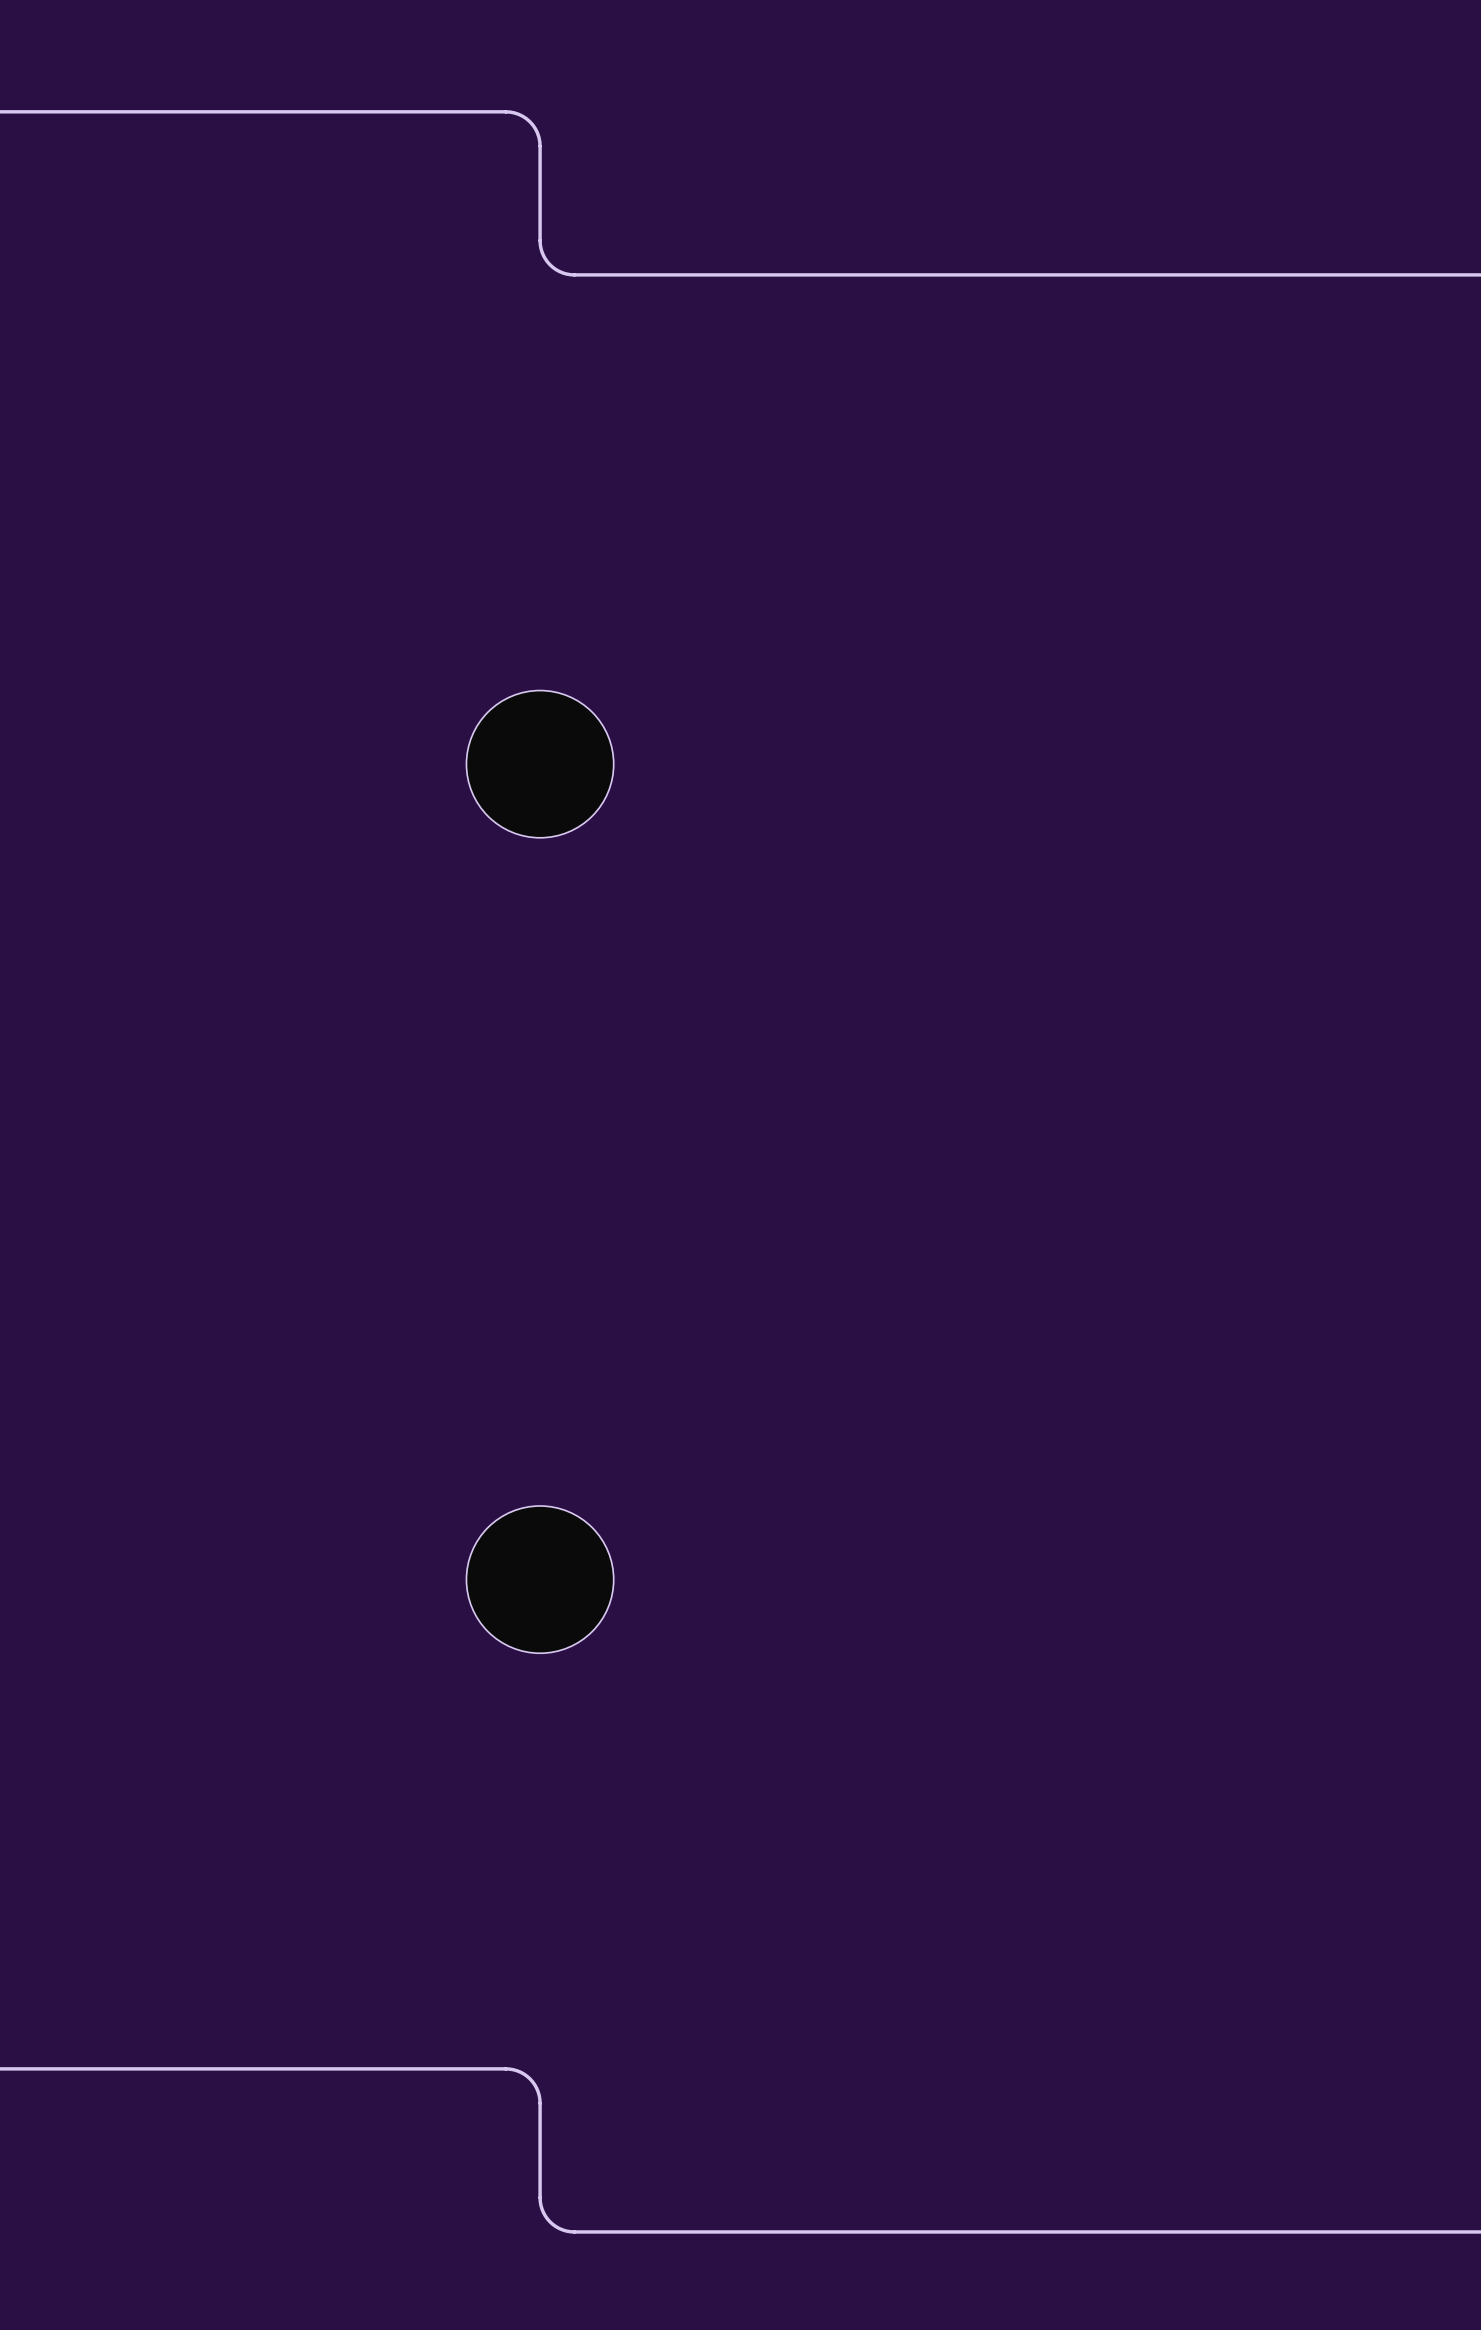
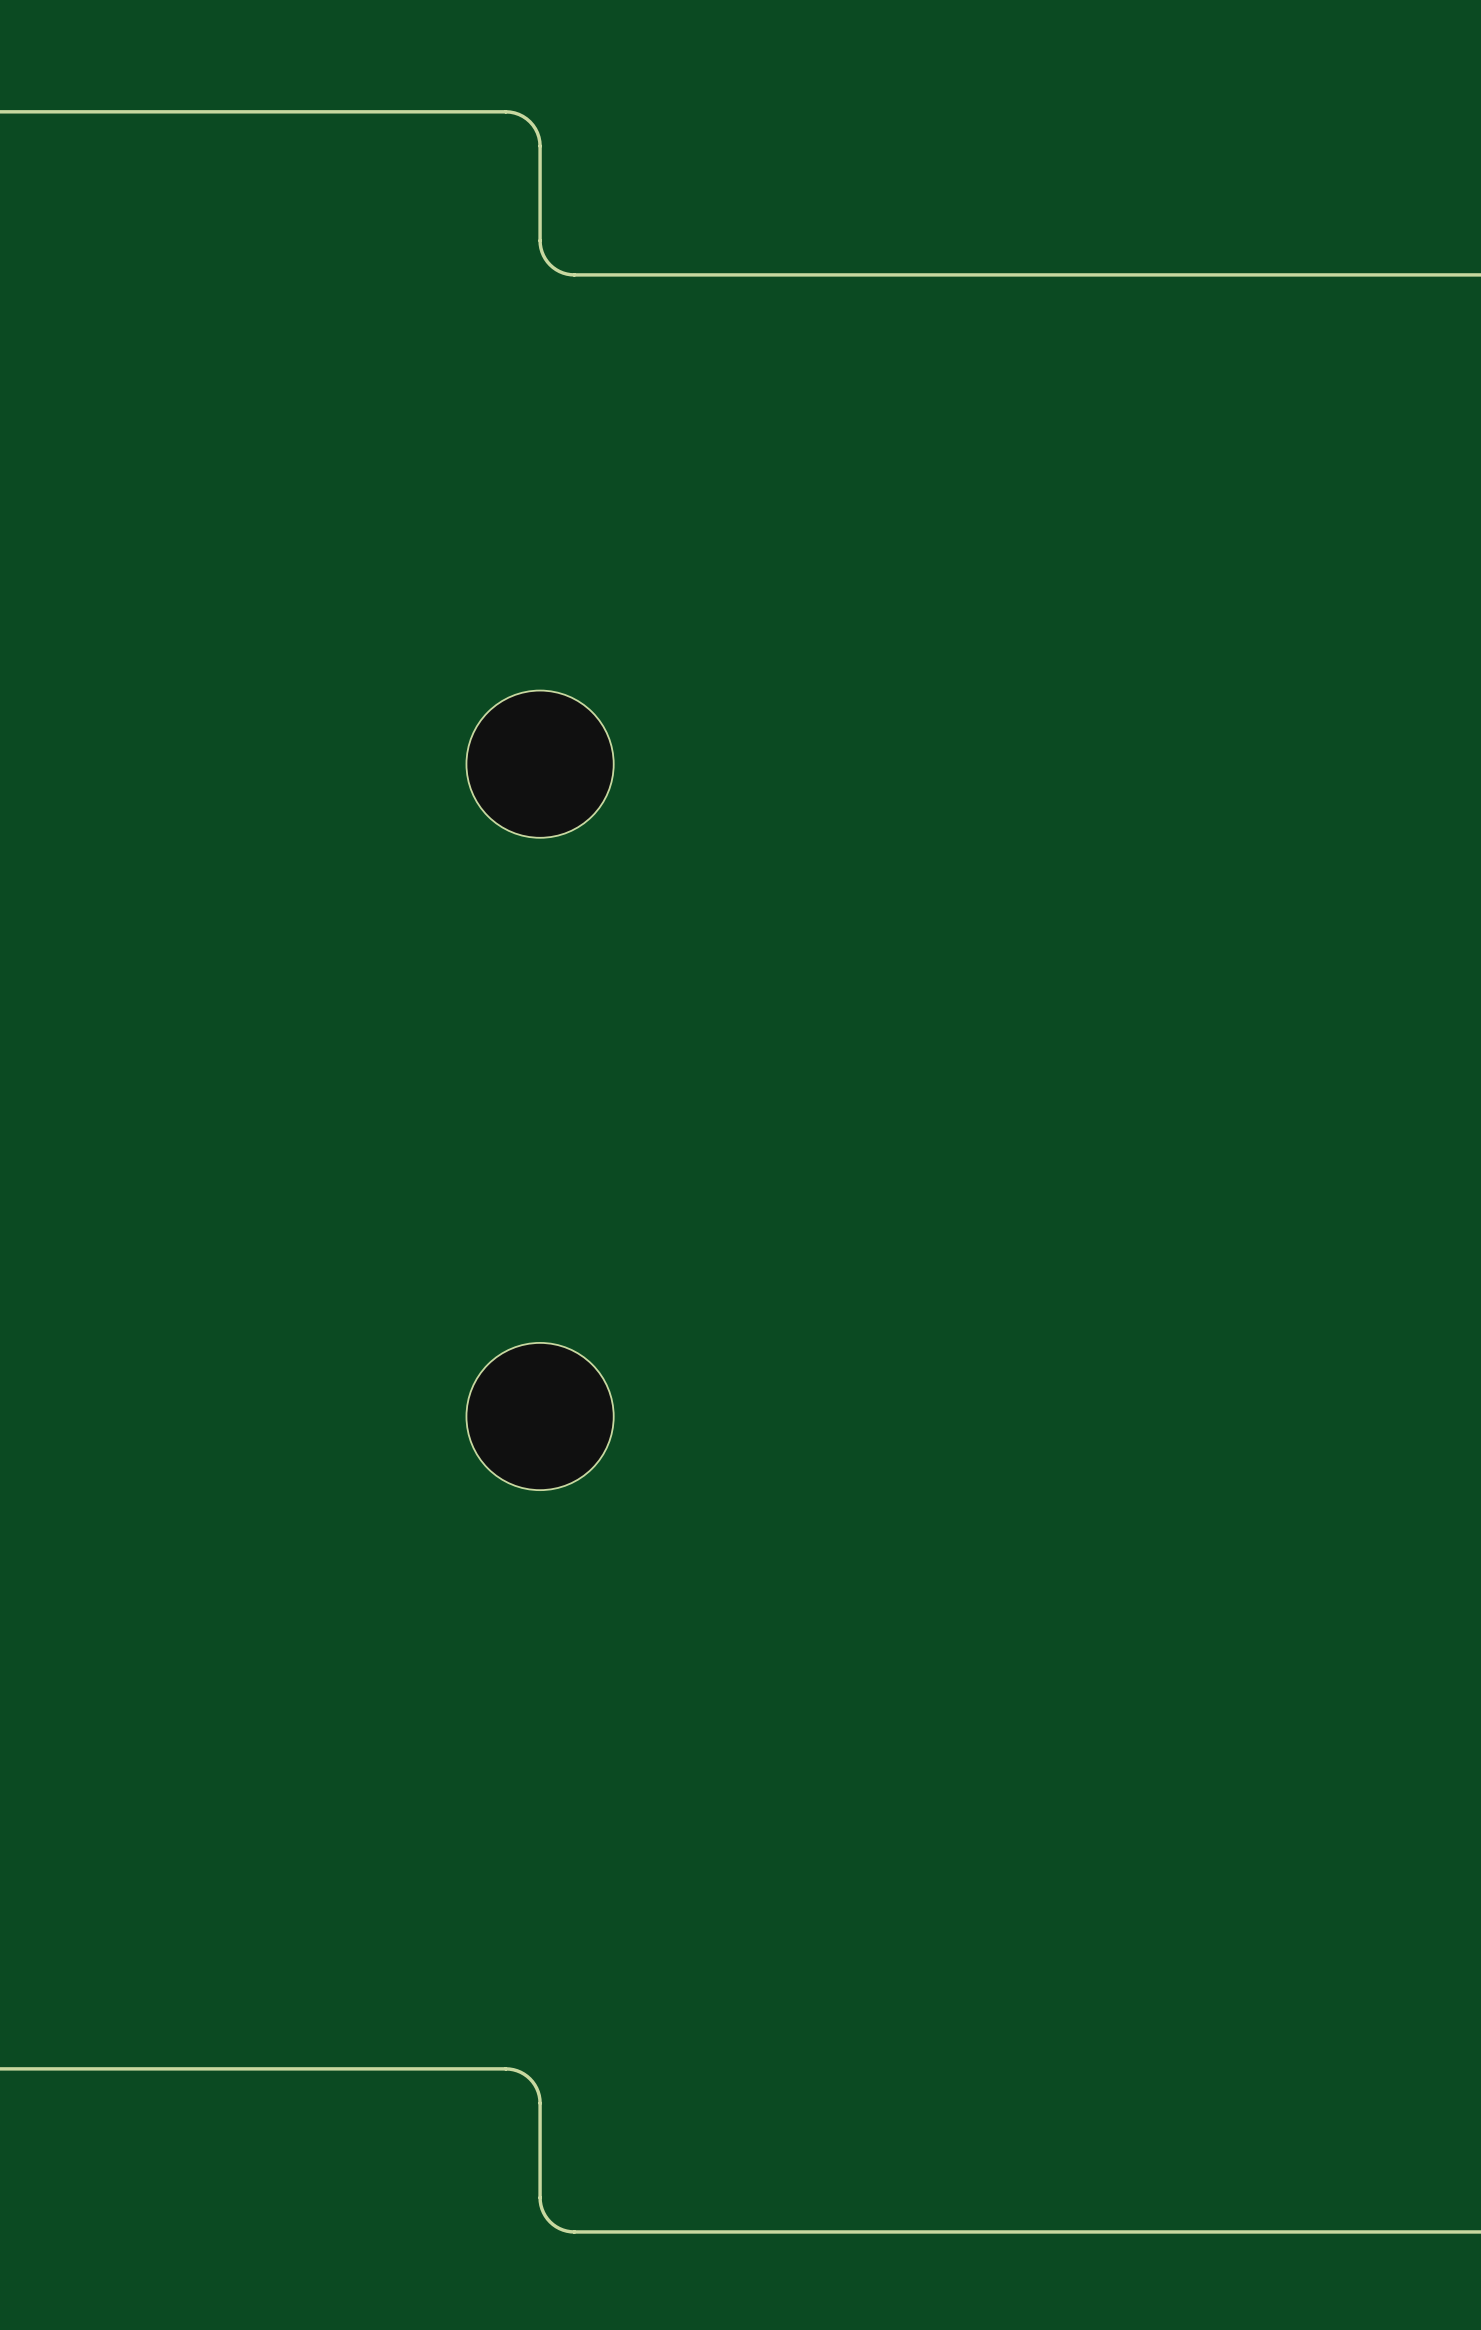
part position: (540, 1579) -> (540, 1416)

